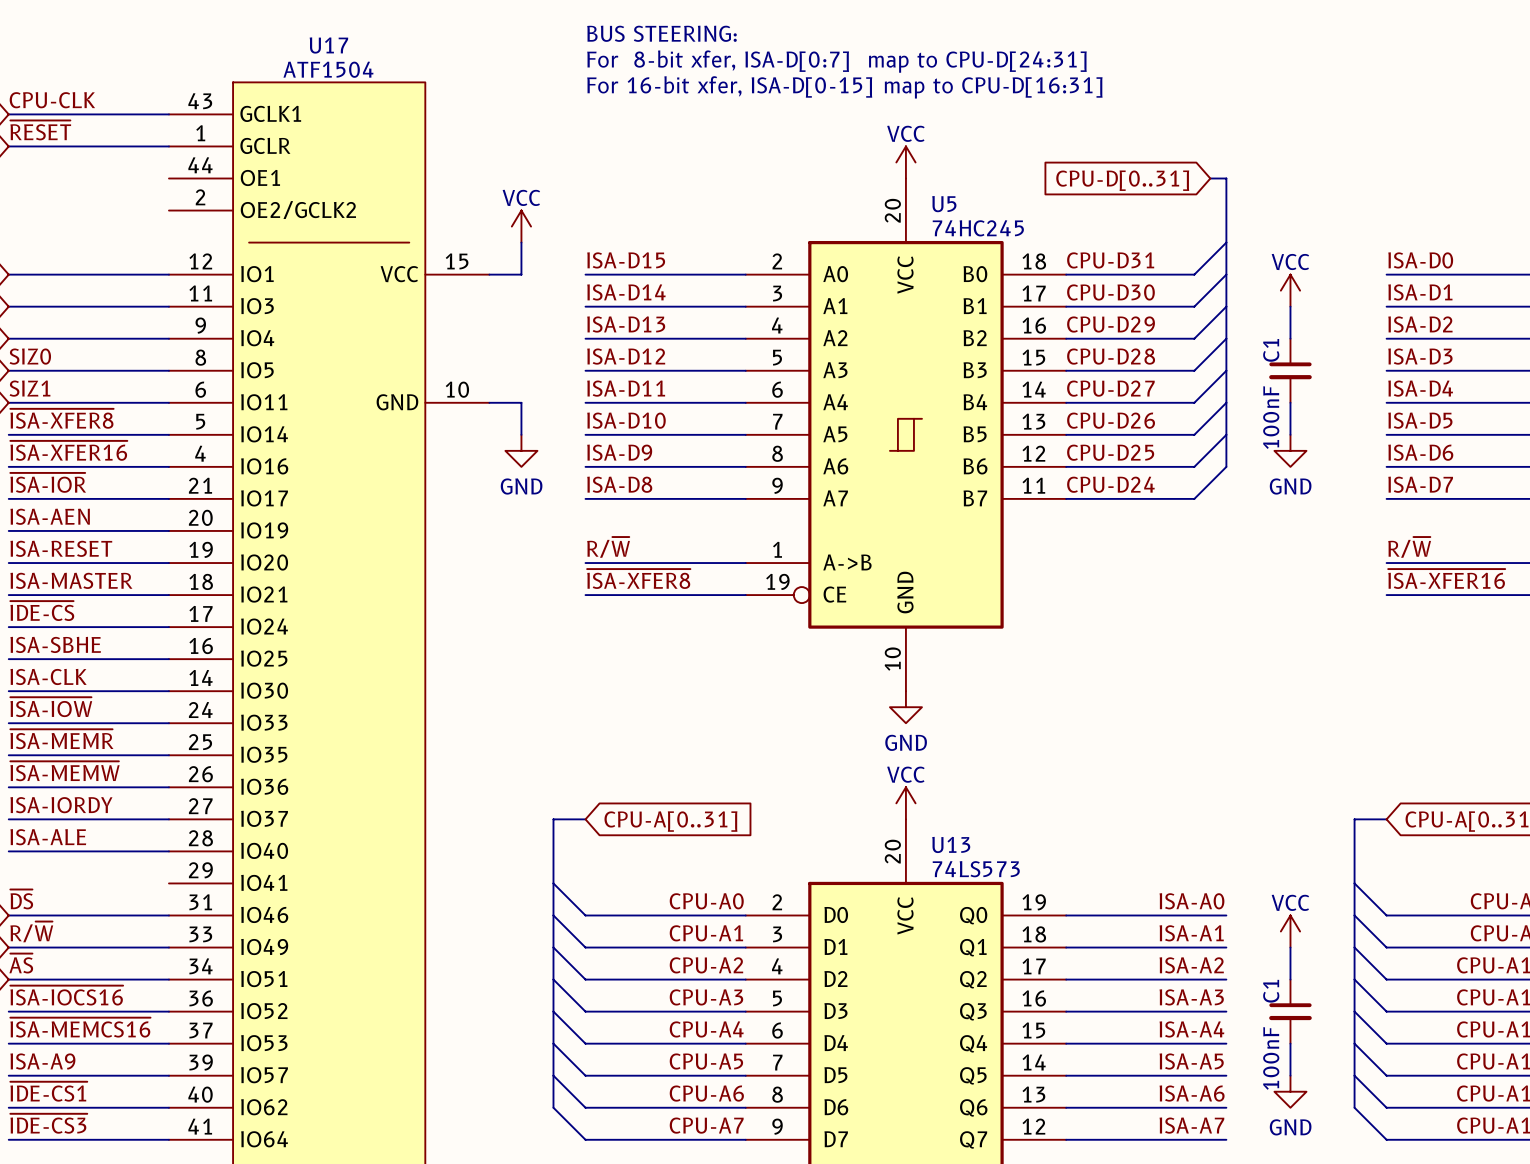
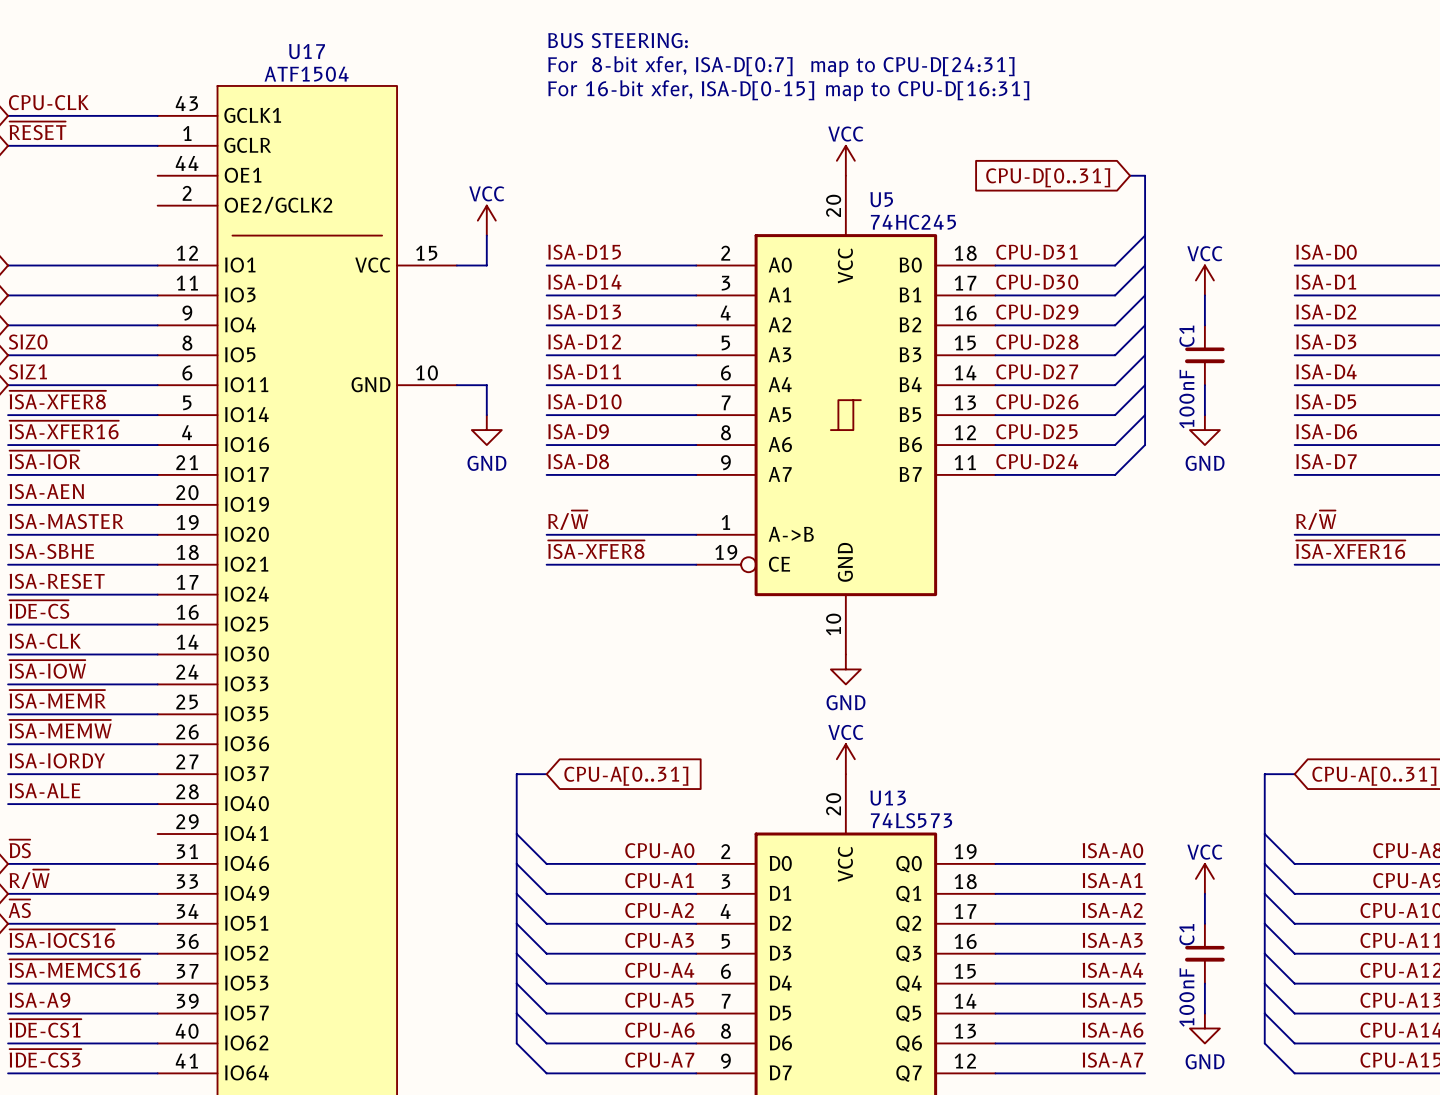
label: ISA-RESET (61, 548) -> ISA-MASTER (66, 521)
label: ISA-MASTER (71, 580) -> ISA-SBHE (51, 551)
label: ~{IDE-CS} (42, 611) -> ISA-RESET (57, 581)
label: ISA-SBHE (55, 644) -> ~{IDE-CS} (39, 609)

